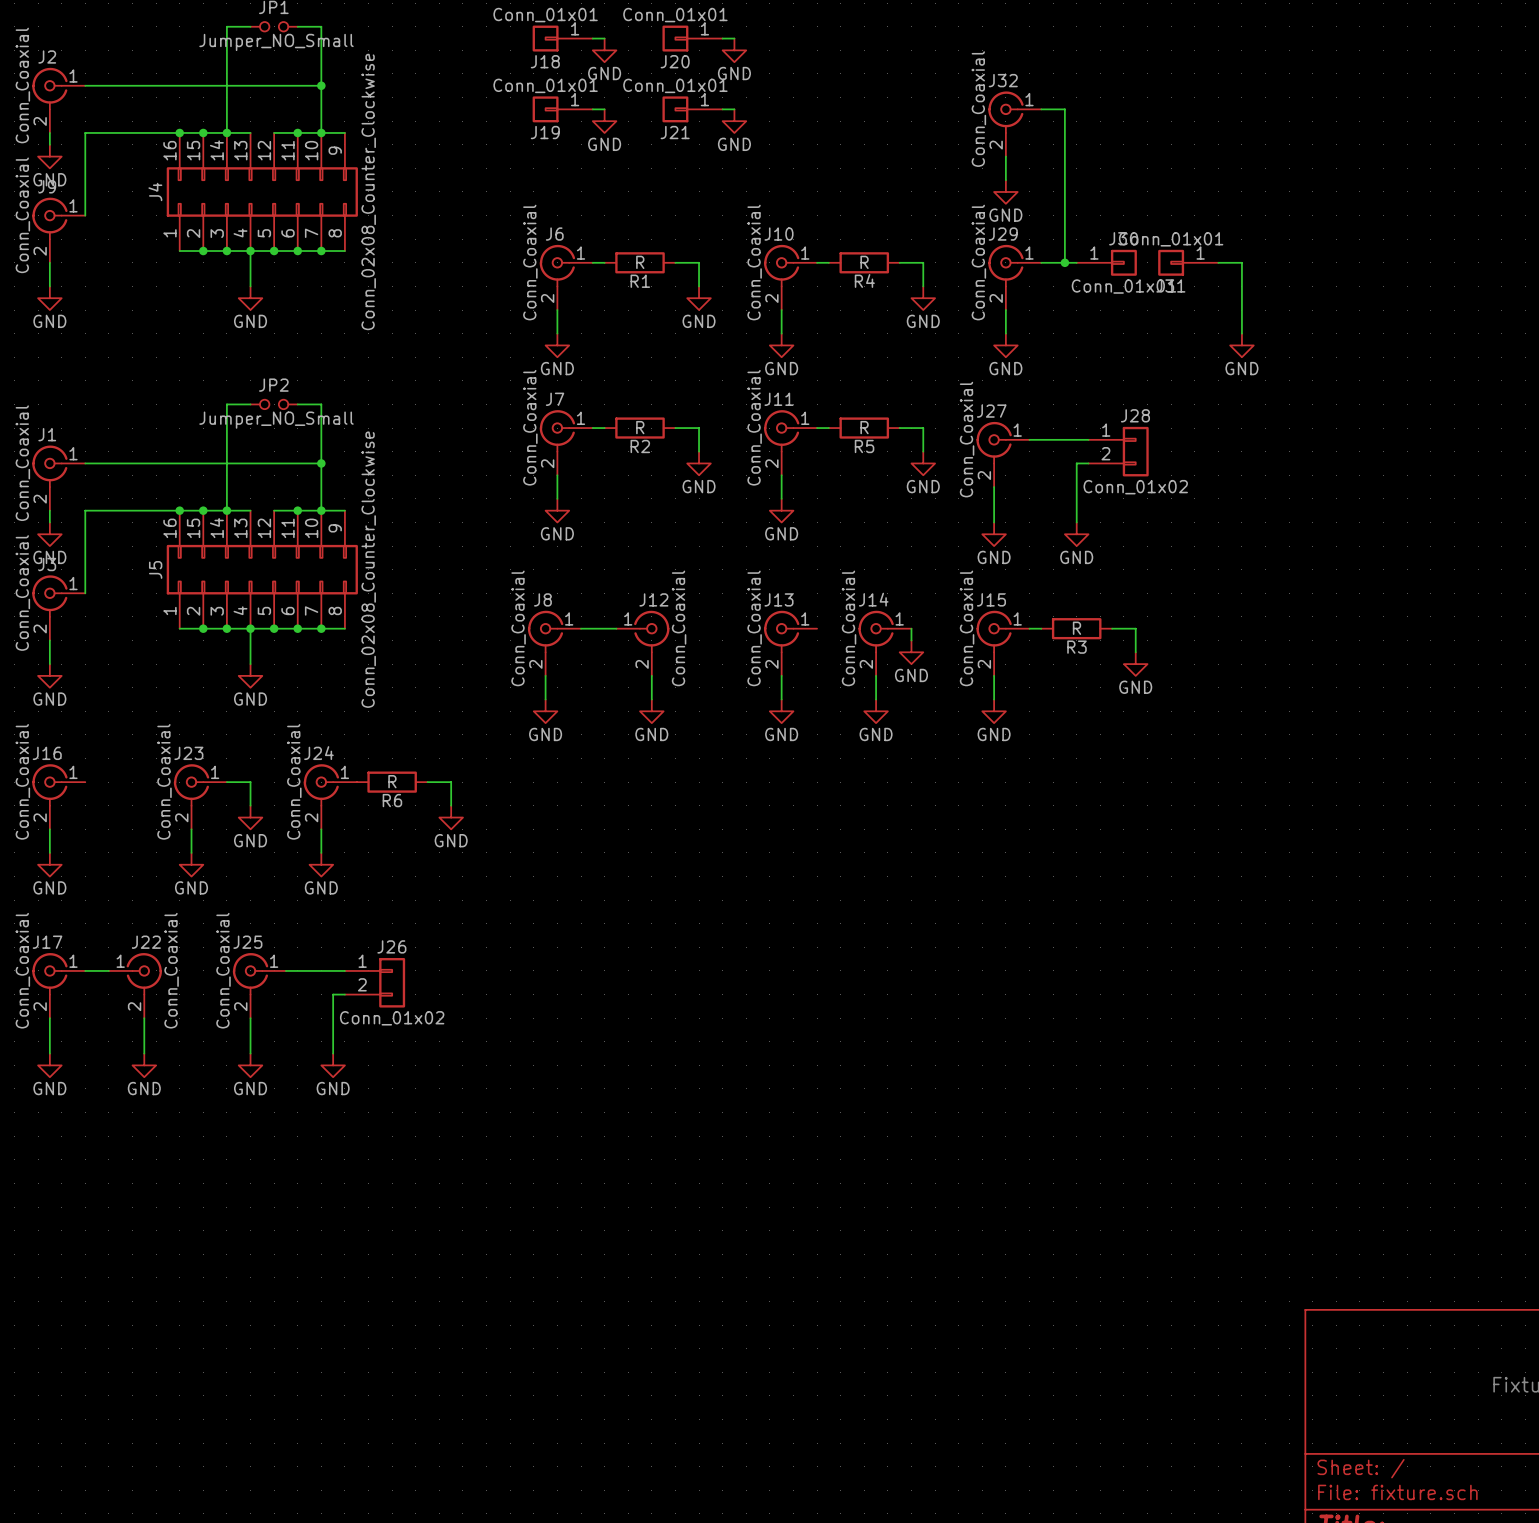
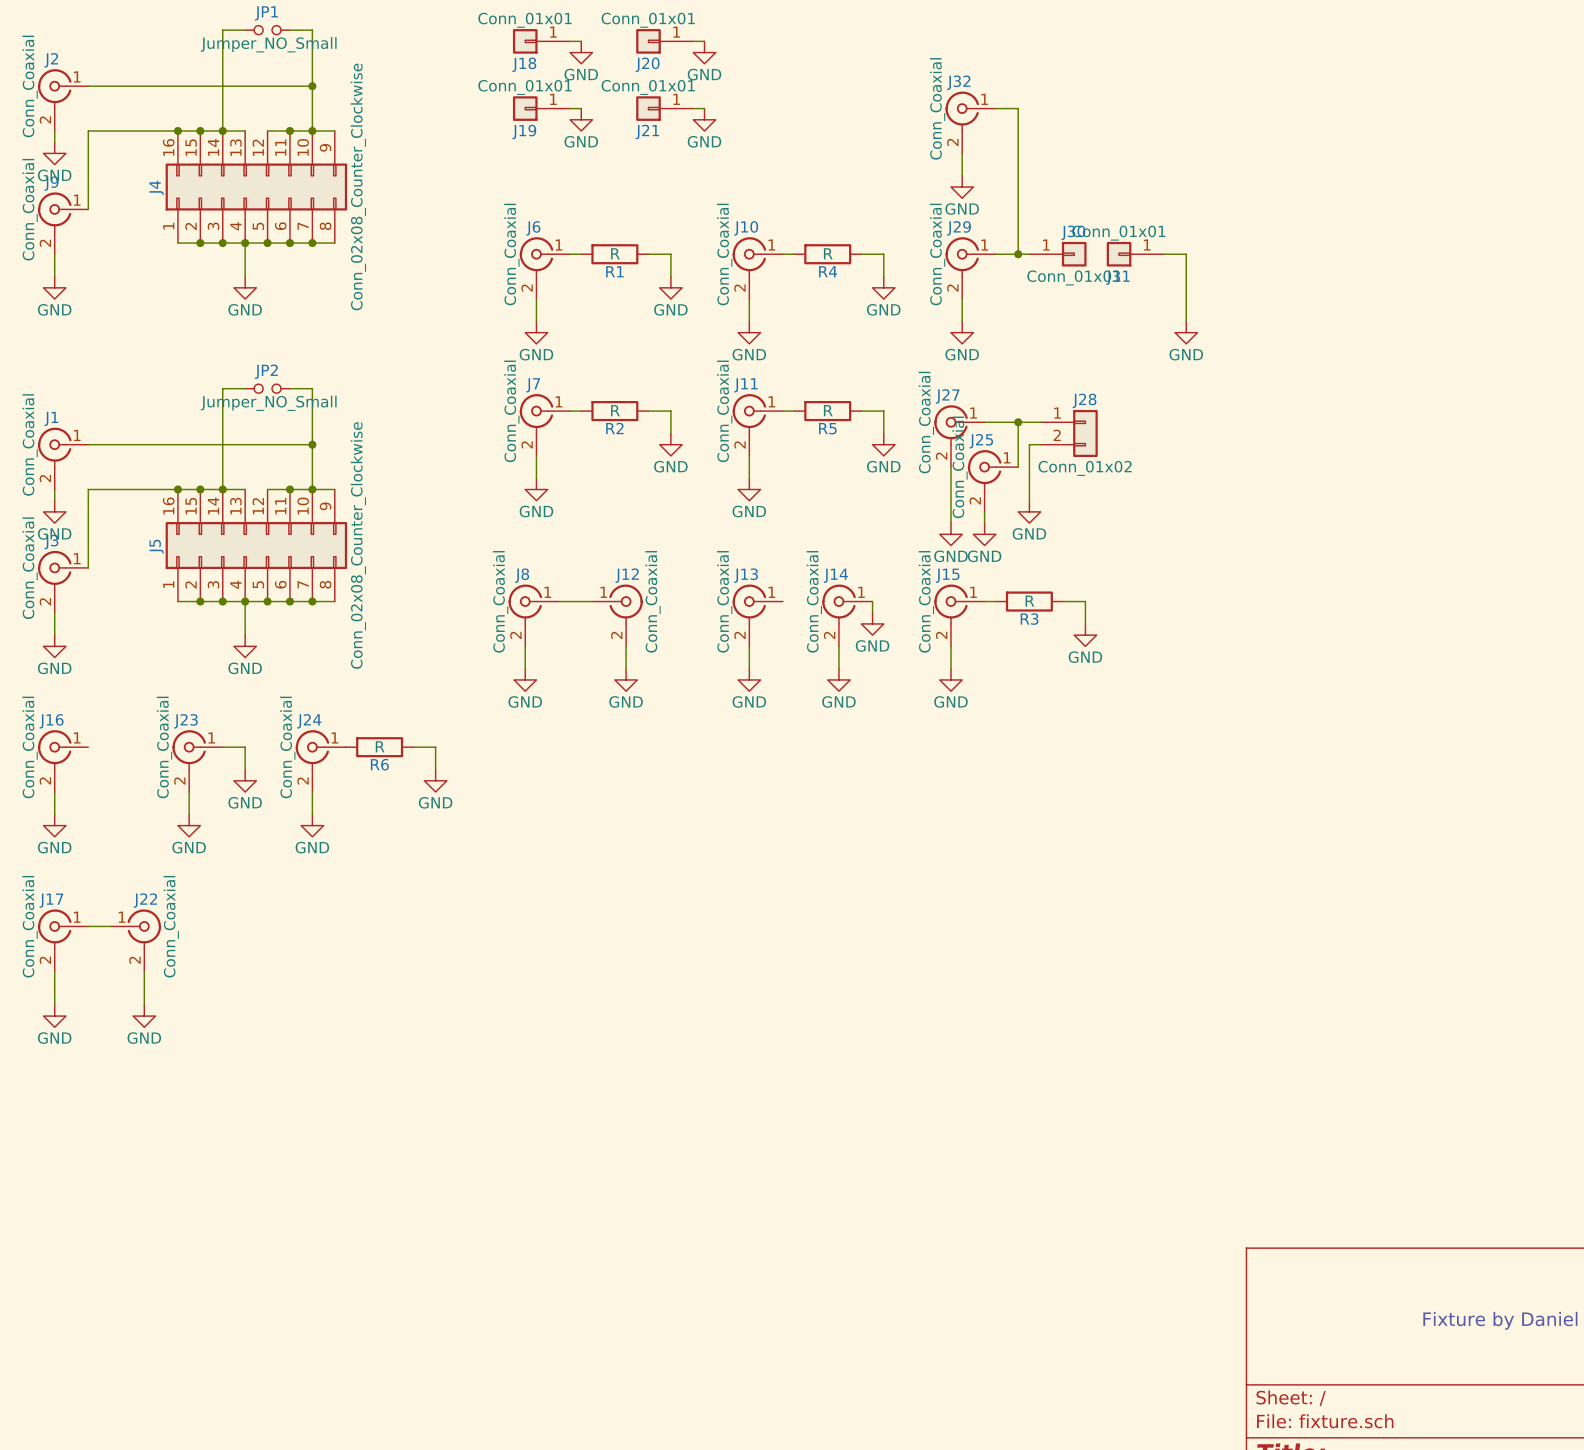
wire: none -> (1018, 422) (1018, 467)
junction: none -> (1018, 422)
power symbol: GND (994, 534) -> none
wire: none -> (984, 511) (984, 523)
power symbol: none -> GND (950, 534)
power symbol: none -> GND (984, 534)
wire: (285, 970) (344, 970) -> none
J26: Conn_01x02 (375, 982) -> none
J25 position: (259, 985) -> (993, 480)
wire: (344, 994) (333, 994) (333, 1053) -> none
wire: (250, 1018) (250, 1053) -> none
power symbol: GND (250, 1065) -> none
power symbol: GND (333, 1065) -> none

